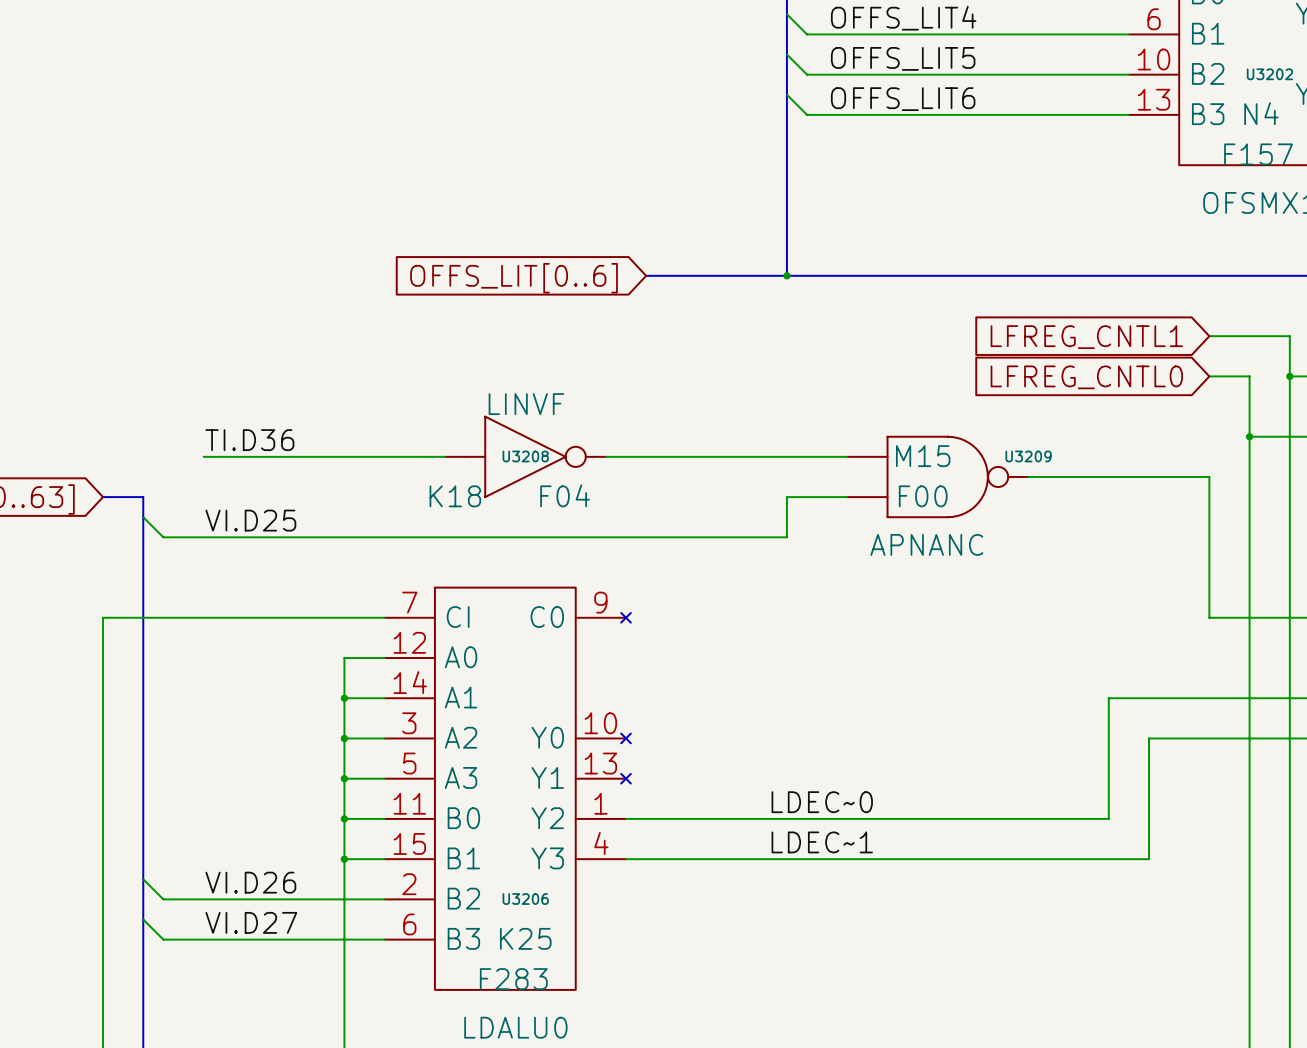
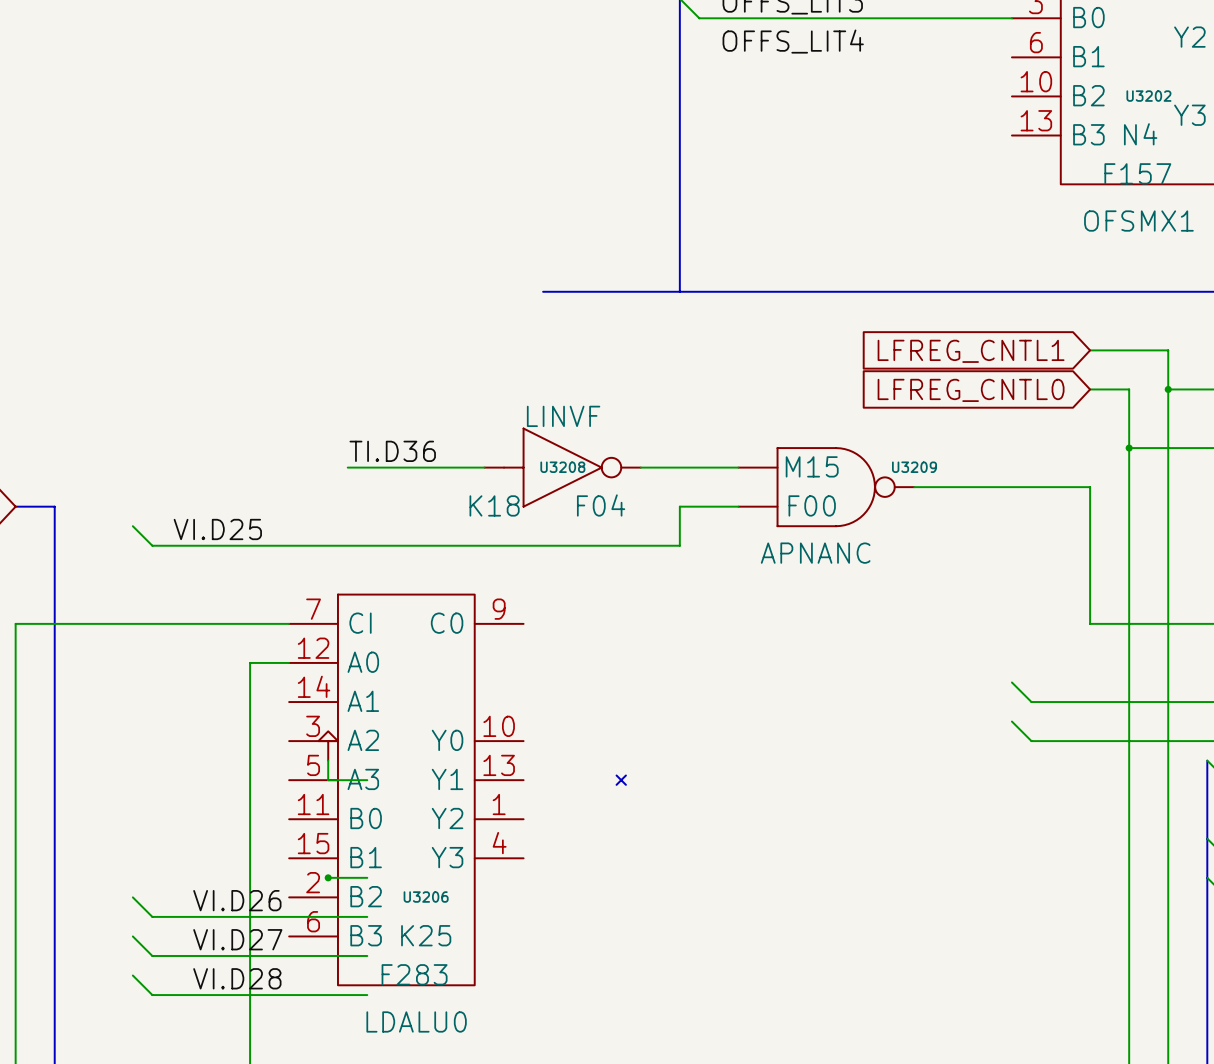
wire: (786, 14) (807, 34) (1128, 34) -> none
wire: (786, 54) (807, 74) (1128, 74) -> none
label: OFFS_LIT5 (903, 58) -> none
wire: (786, 94) (807, 114) (1128, 114) -> none
label: OFFS_LIT6 (903, 99) -> none
junction: (786, 275) -> none
global label: OFFS_LIT[0..6] (514, 278) -> none
label: TI.D36 (249, 440) -> none
label: none -> TI.D36 (392, 451)
wire: (203, 456) (444, 456) -> (484, 467) (347, 467)
U3208 position: (525, 456) -> (562, 467)
wire: (605, 456) (746, 456) -> none
wire: (143, 517) (163, 537) (243, 537) -> (132, 526) (152, 545)
label position: VI.D25 (250, 520) -> VI.D25 (217, 529)
no-connect mark: (626, 617) -> none
wire: (344, 698) (384, 698) -> none
junction: (344, 698) -> none
wire: (1149, 698) (1108, 698) (1108, 818) (626, 818) -> (1031, 702) (1011, 682)
wire: (344, 738) (384, 738) -> none
junction: (344, 738) -> none
no-connect mark: (626, 738) -> none
wire: (1149, 738) (1149, 859) (626, 859) -> (1031, 741) (1011, 721)
power symbol: none -> (328, 745)
wire: none -> (328, 760) (328, 780) (367, 780)
wire: (344, 778) (384, 778) -> none
junction: (344, 778) -> none
no-connect mark: (626, 778) -> none
no-connect mark: none -> (621, 780)
label: LDEC~0 (822, 802) -> none
wire: (344, 818) (384, 818) -> none
junction: (344, 818) -> none
label: LDEC~1 (822, 842) -> none
wire: (344, 859) (384, 859) -> (328, 877) (367, 877)
junction: (344, 859) -> none
wire: (143, 879) (163, 899) (384, 899) -> (132, 897) (152, 916) (367, 916)
junction: none -> (328, 877)
label position: VI.D26 (250, 882) -> VI.D26 (237, 900)
wire: (143, 919) (163, 939) (384, 939) -> (132, 936) (152, 955) (367, 955)
label position: VI.D27 (251, 922) -> VI.D27 (237, 939)
wire: none -> (132, 975) (152, 995) (367, 995)
label: none -> VI.D28 (237, 978)

